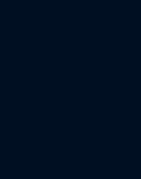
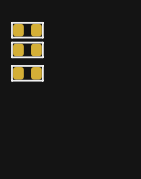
part: none -> (27, 30)
part: none -> (27, 49)
part: none -> (27, 73)

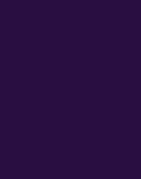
part: (27, 30) -> none
part: (27, 49) -> none
part: (27, 73) -> none

